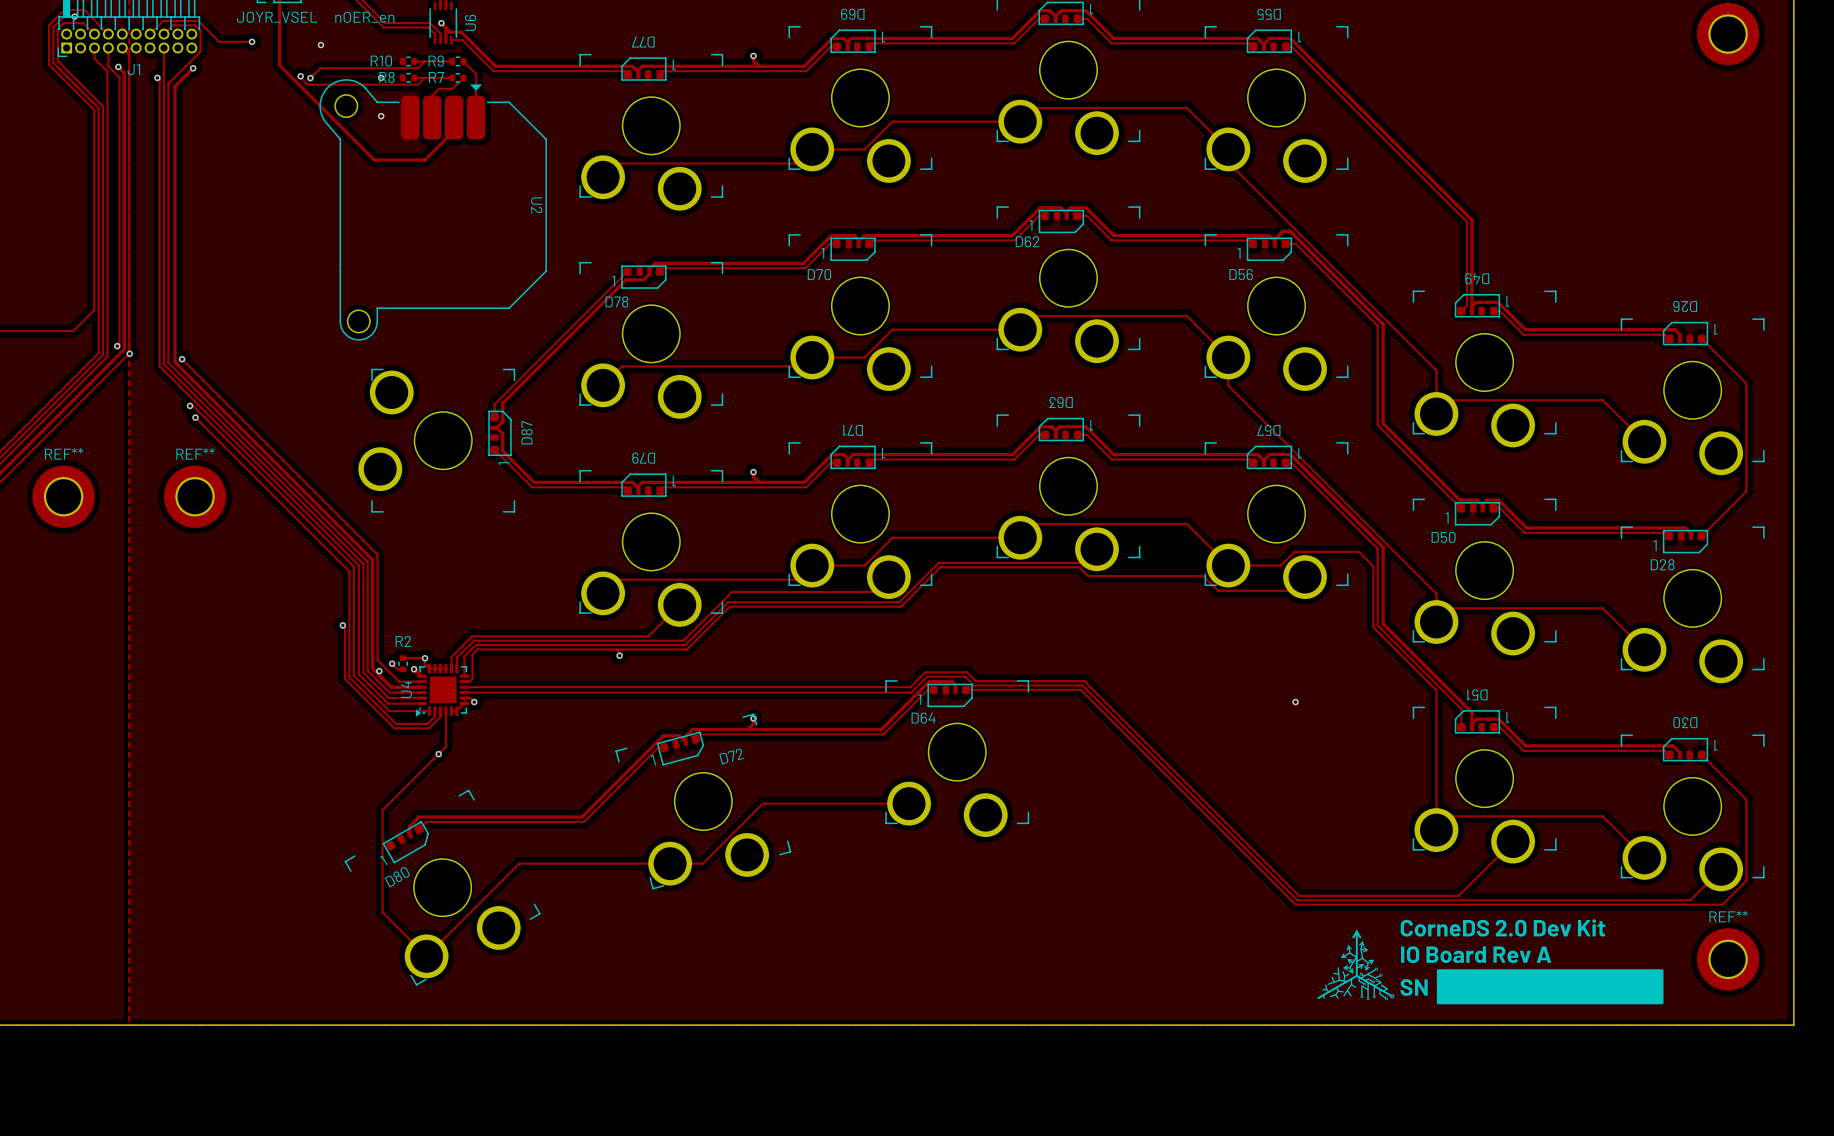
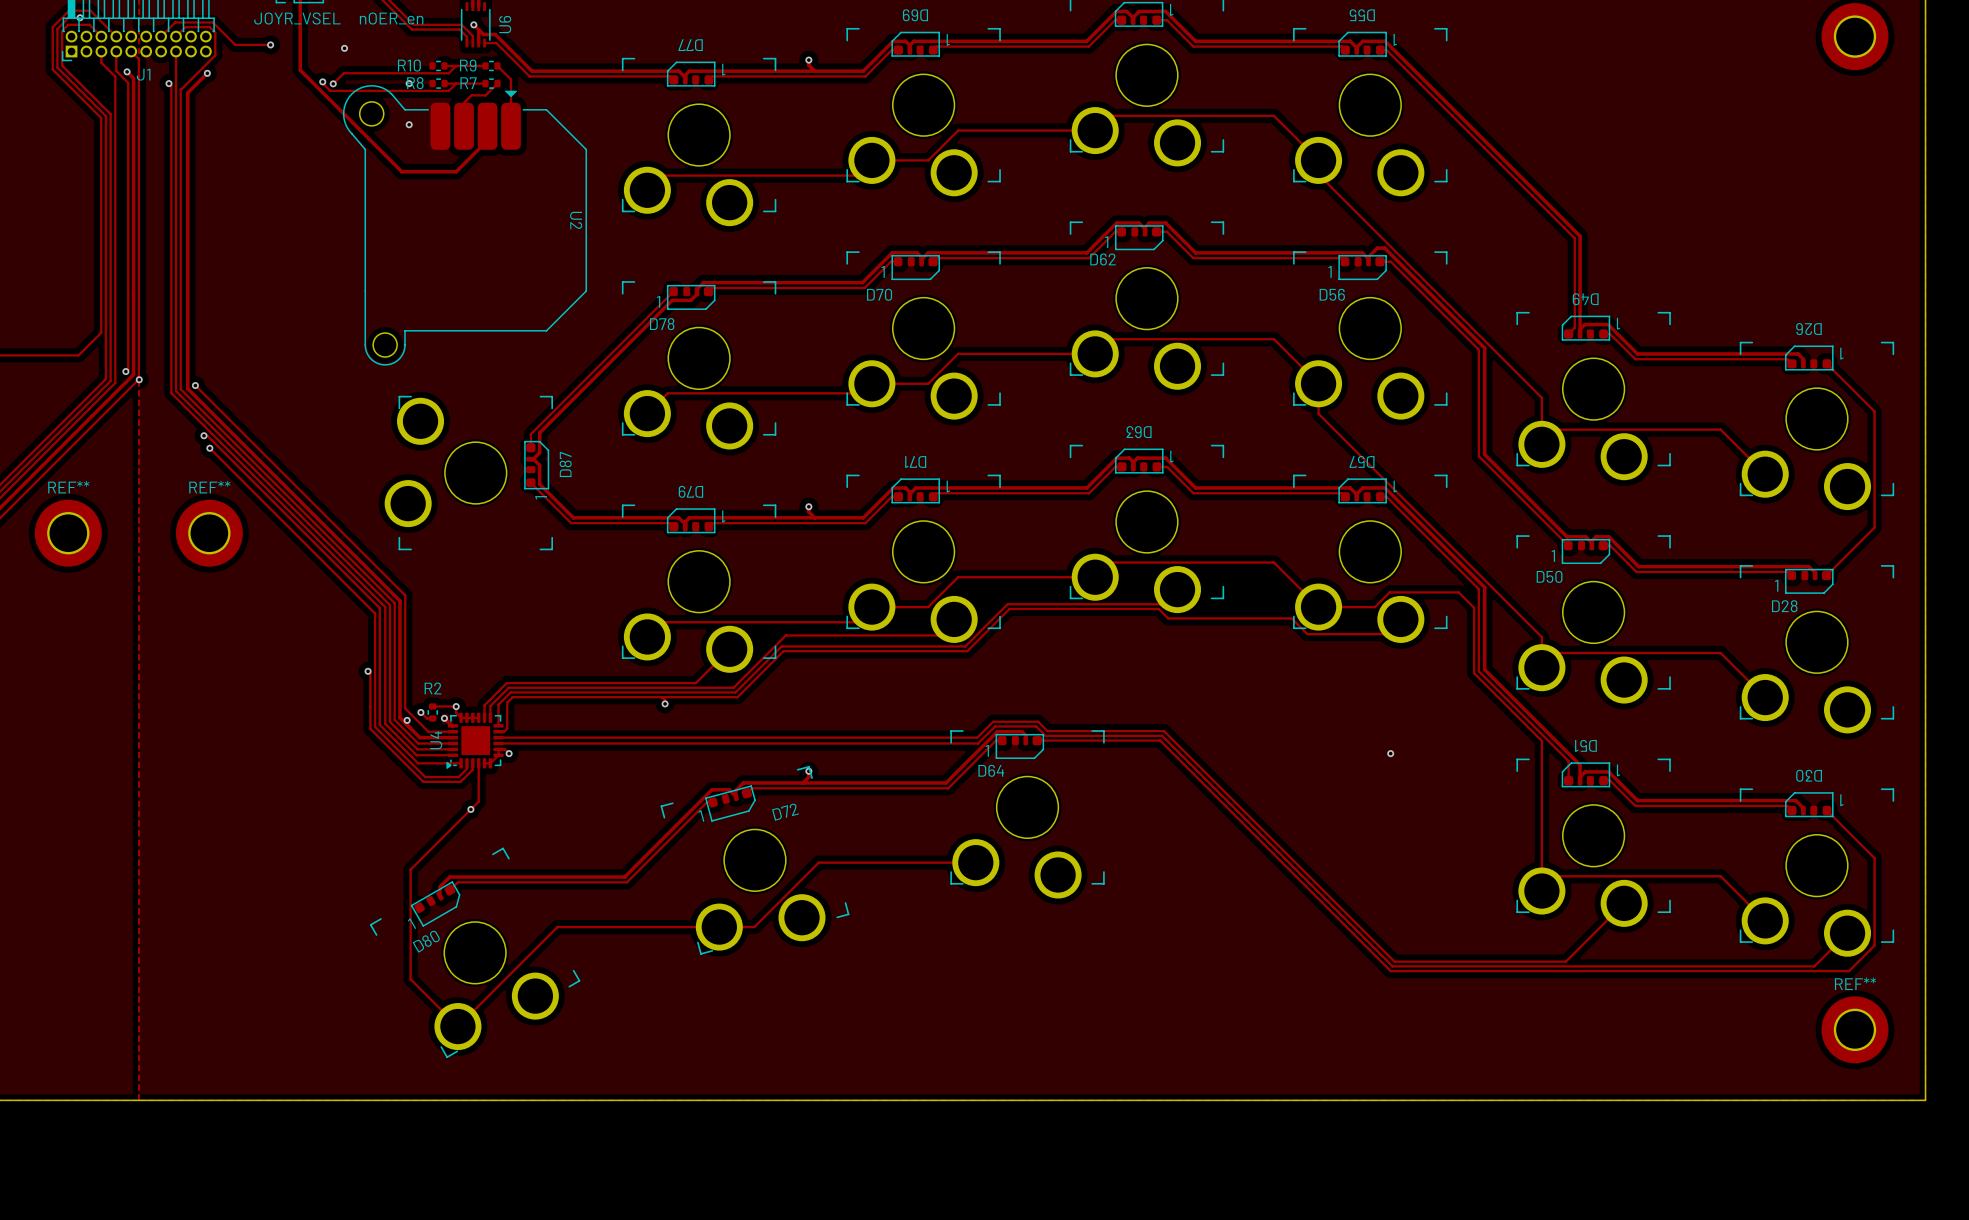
text: CorneDS 2.0 Dev Kit (1503, 927) -> none
drawing: [1317, 929, 1395, 1001] -> none
text: IO Board Rev A (1476, 954) -> none
drawing: [1436, 969, 1664, 1005] -> none
text: SN (1414, 987) -> none

